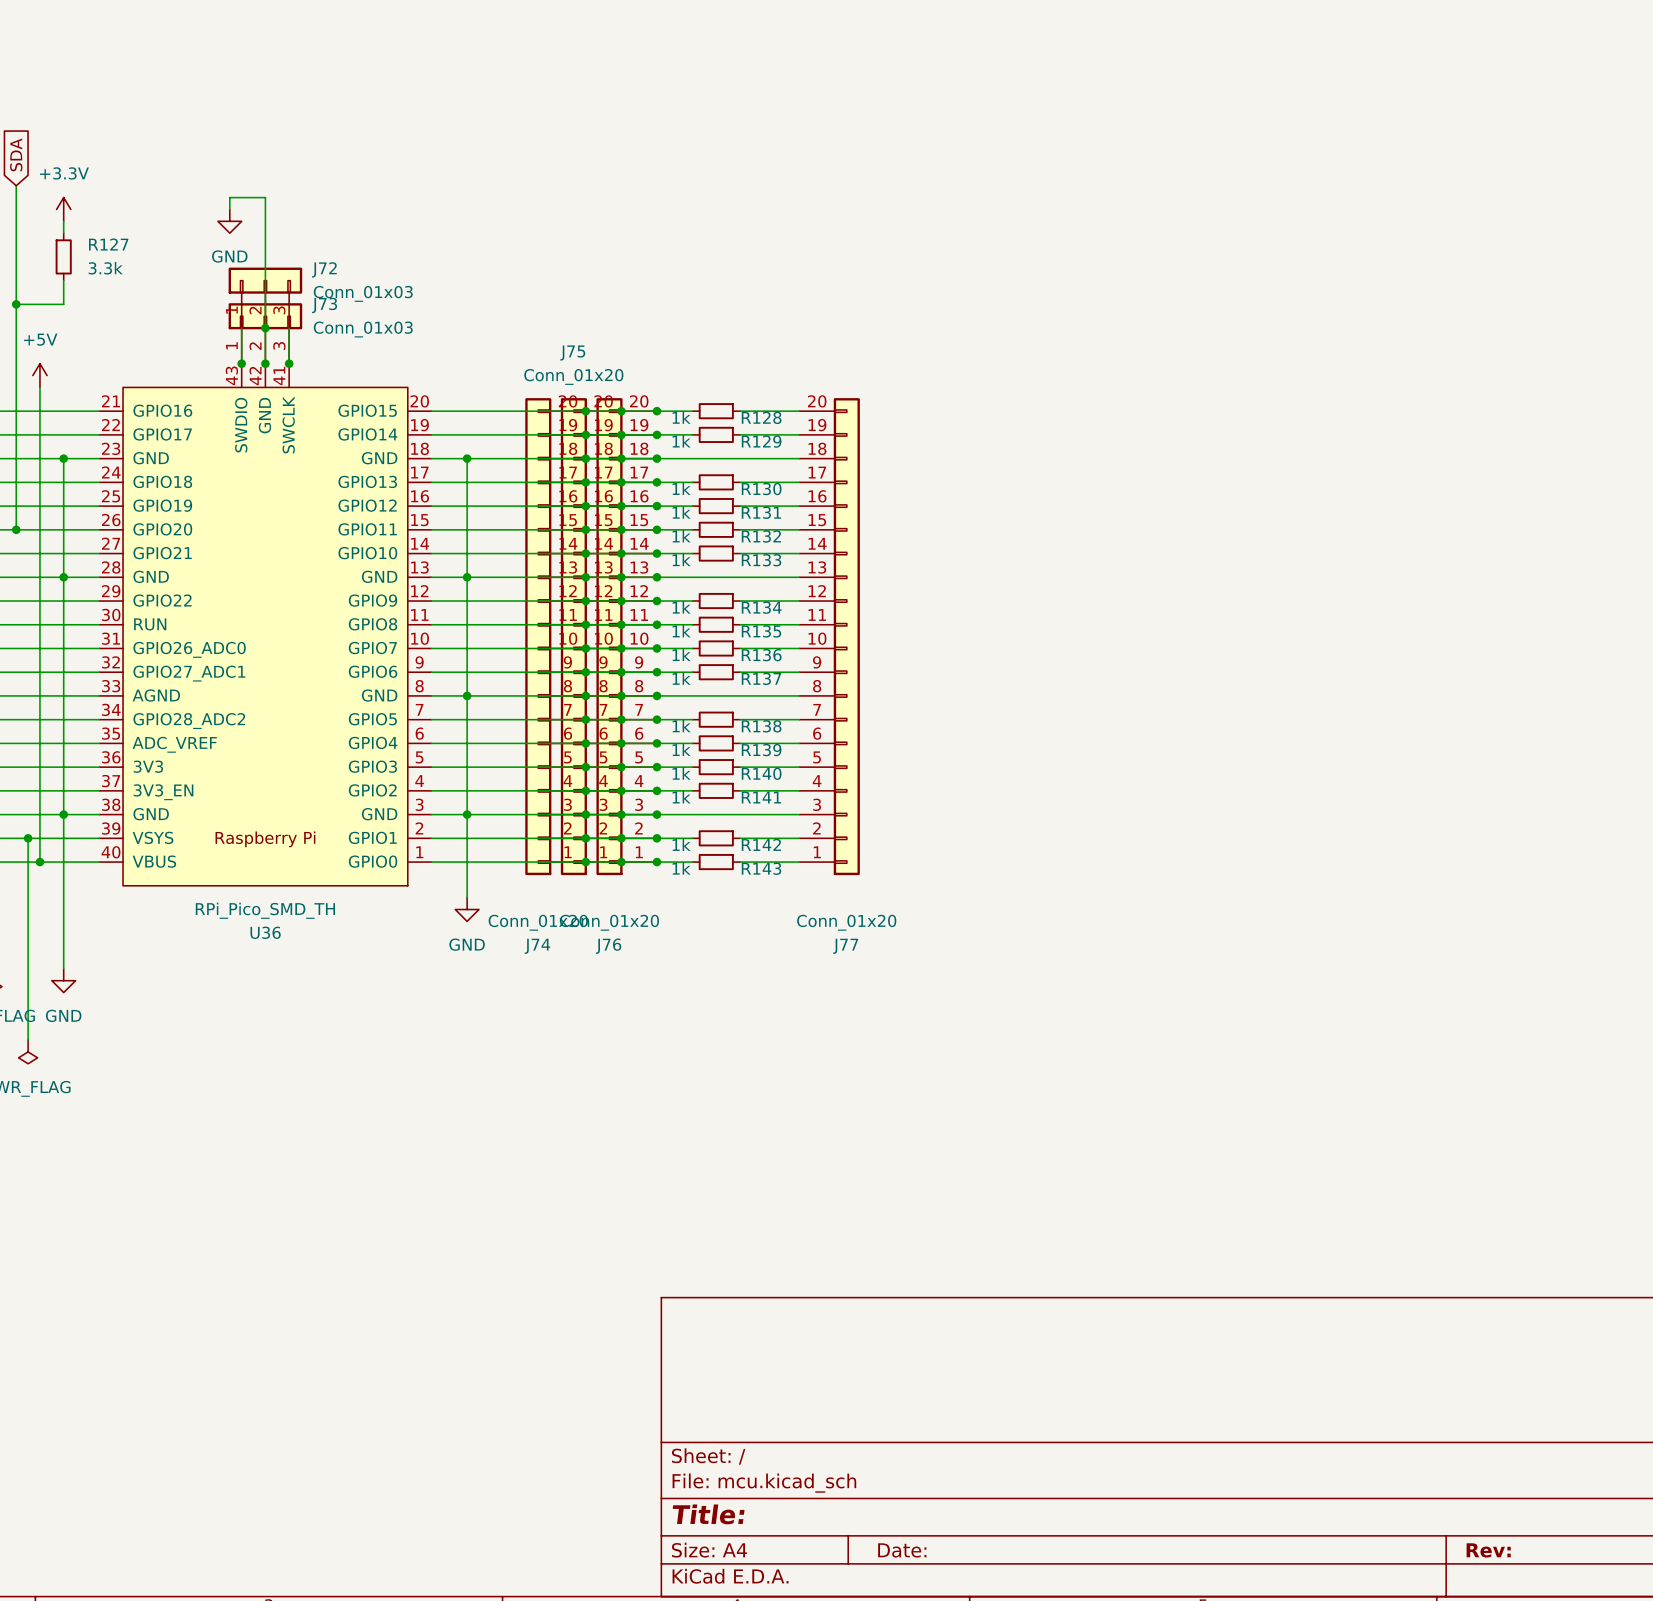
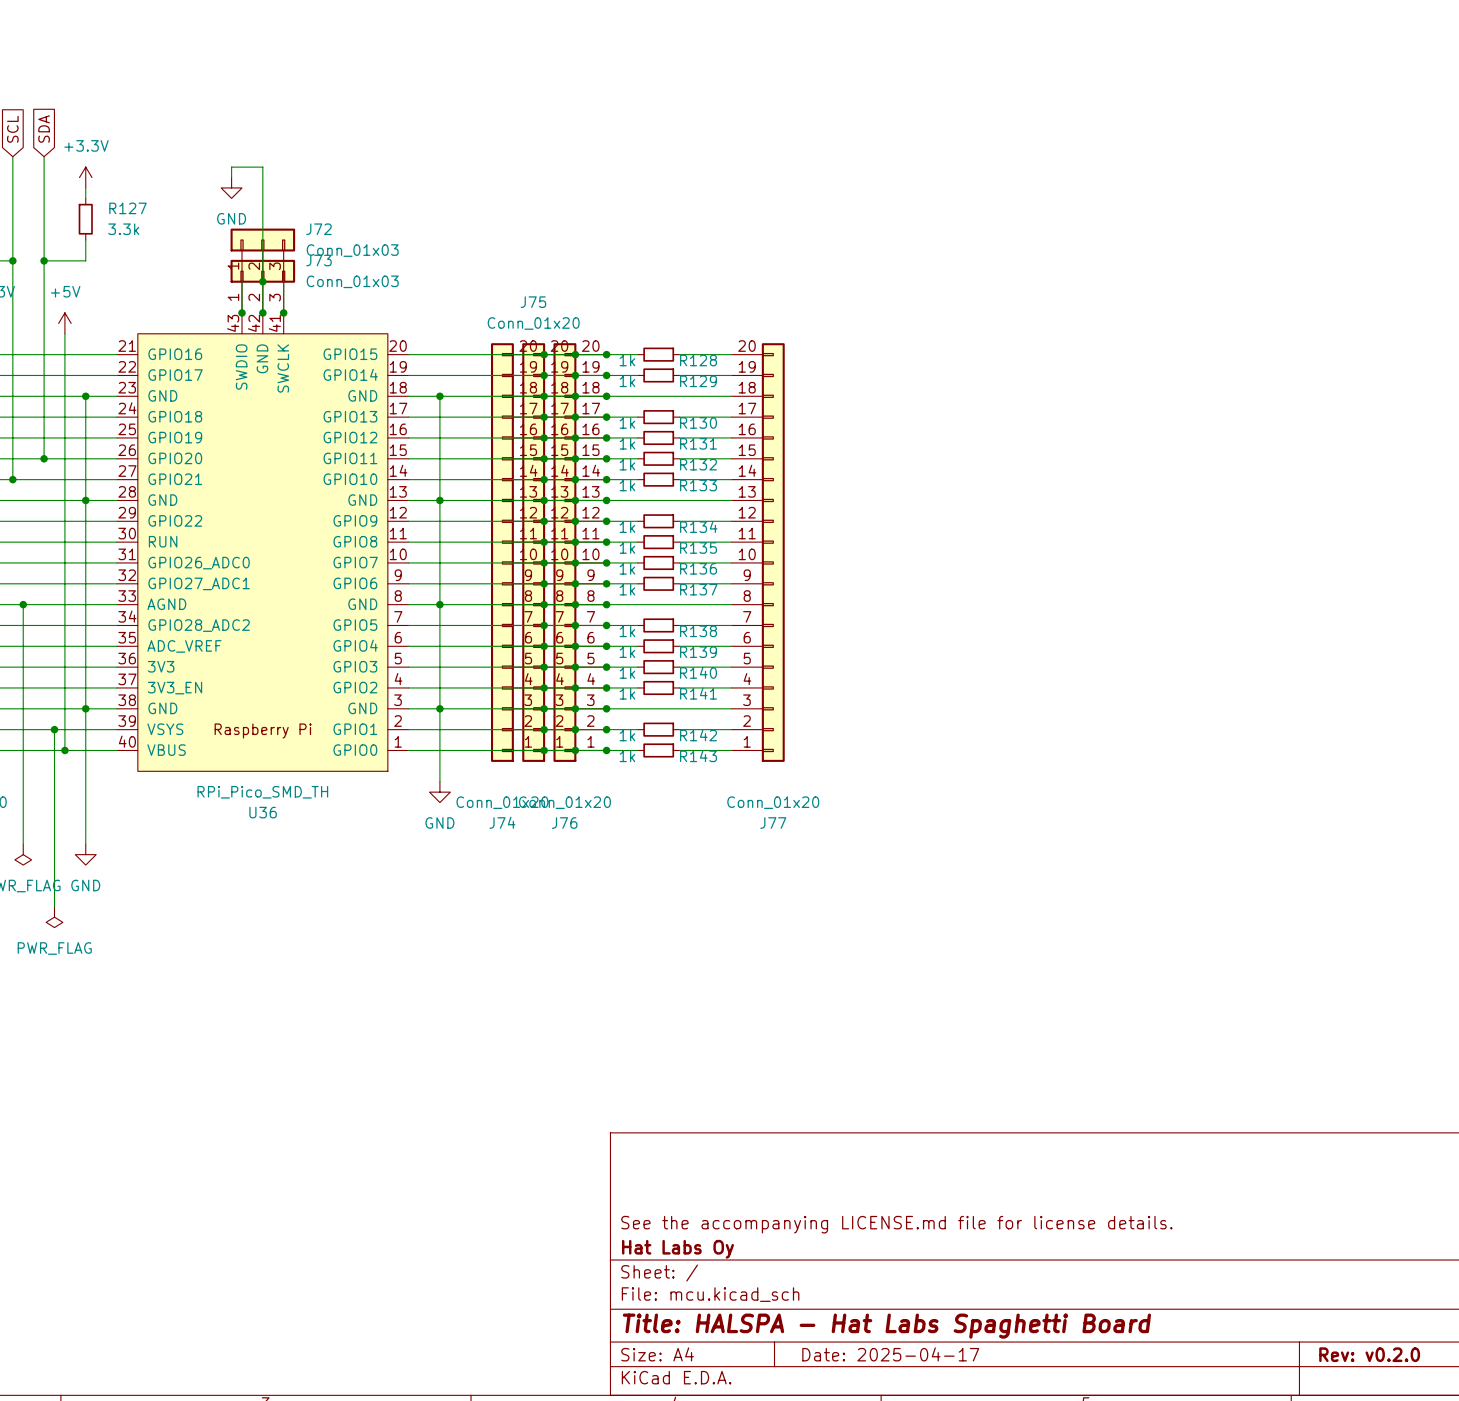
title block: none -> See the accompanying LICENSE.md file for license details. (896, 1224)
title block: none -> Hat Labs Oy (677, 1249)
title block: Title: (708, 1514) -> Title: HALSPA - Hat Labs Spaghetti Board (886, 1326)
title block: Date: (902, 1550) -> Date: 2025-04-17 (890, 1354)
title block: Rev: (1488, 1550) -> Rev: v0.2.0 (1369, 1354)

